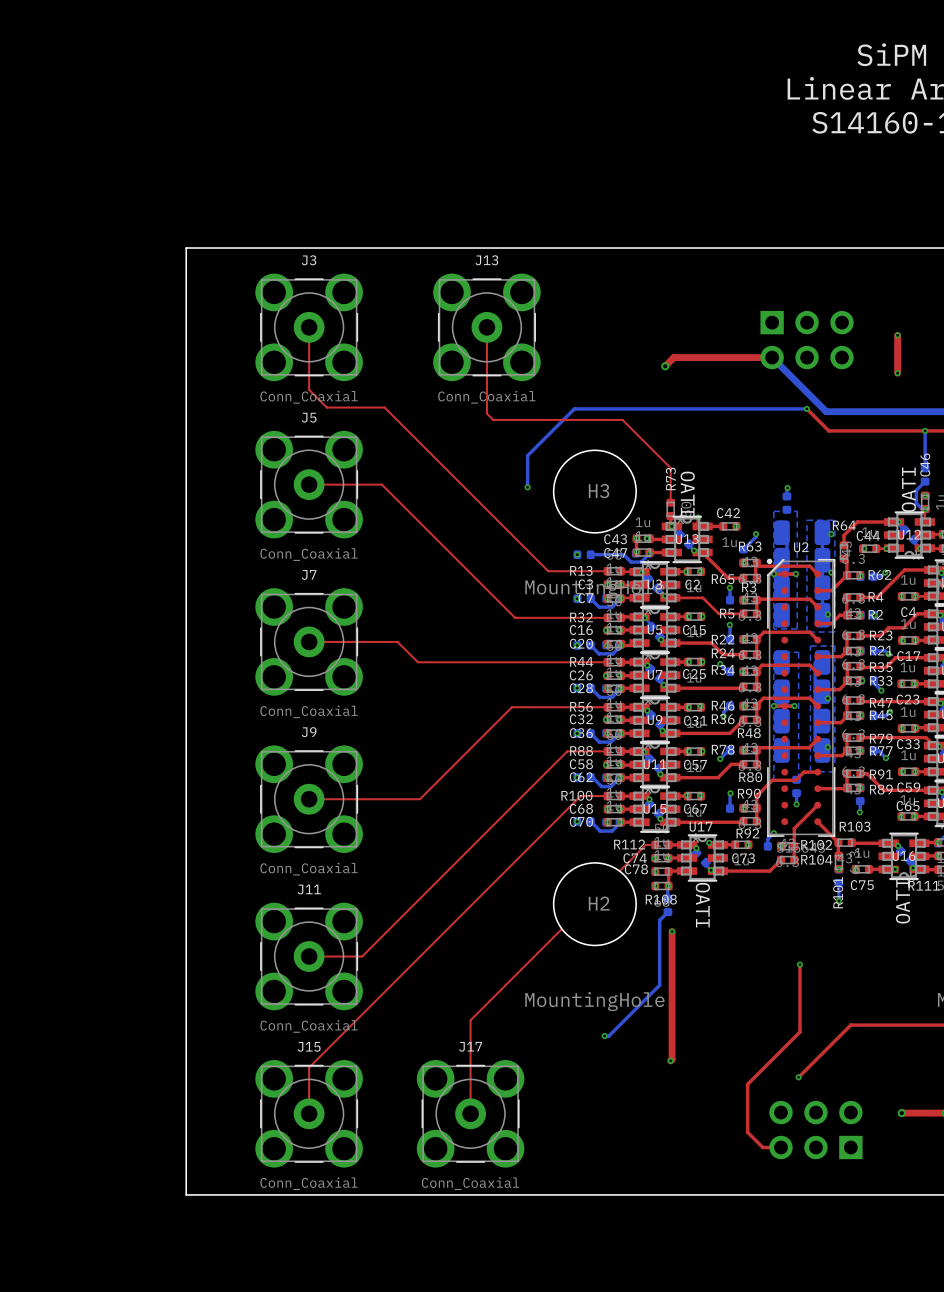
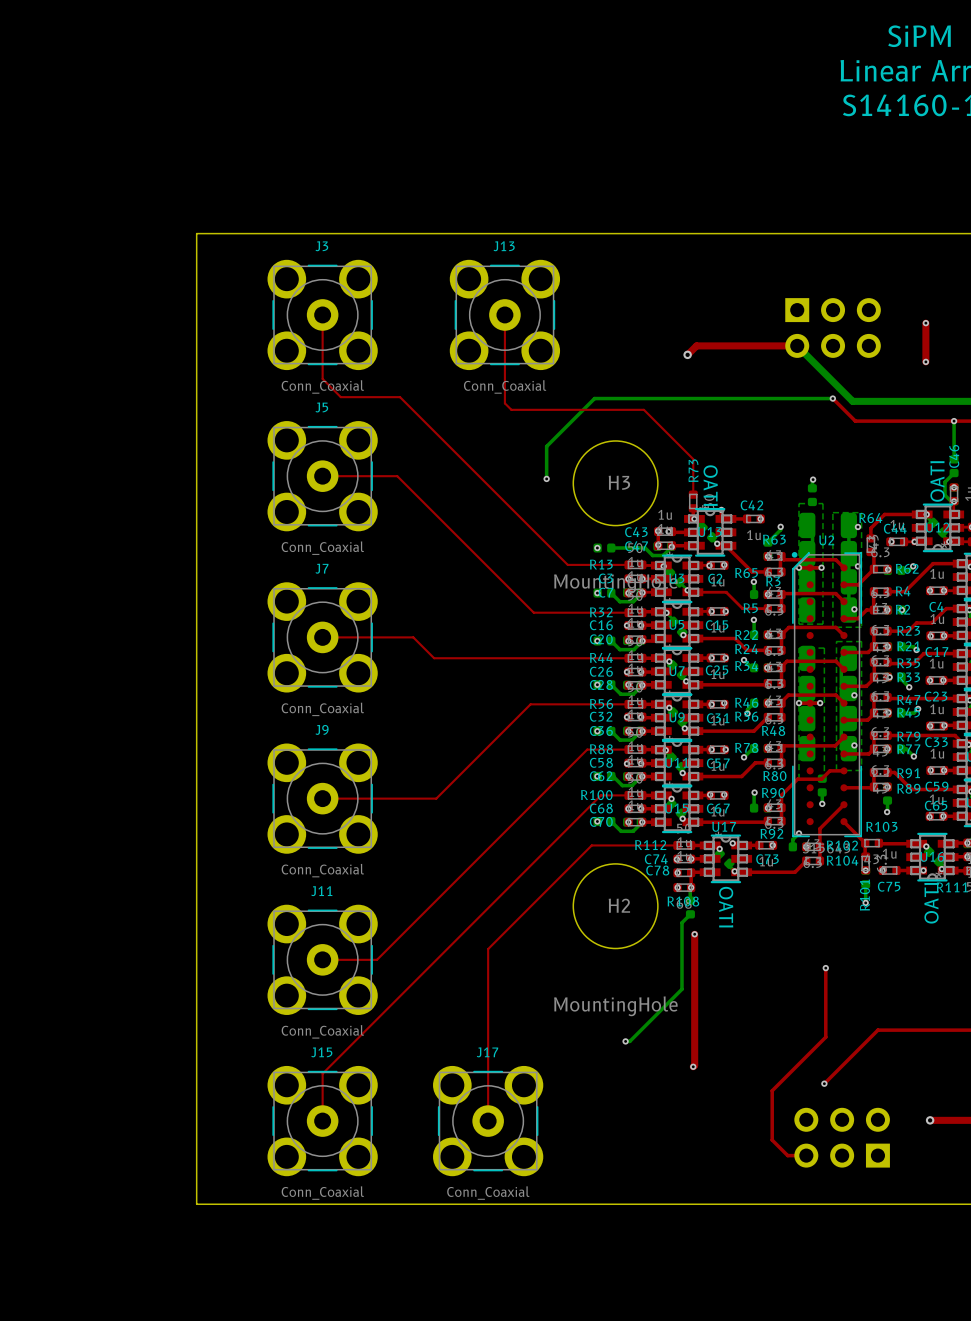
top track: (645, 844) (470, 1020) -> (667, 845) (591, 845) (488, 949) (488, 1025)

